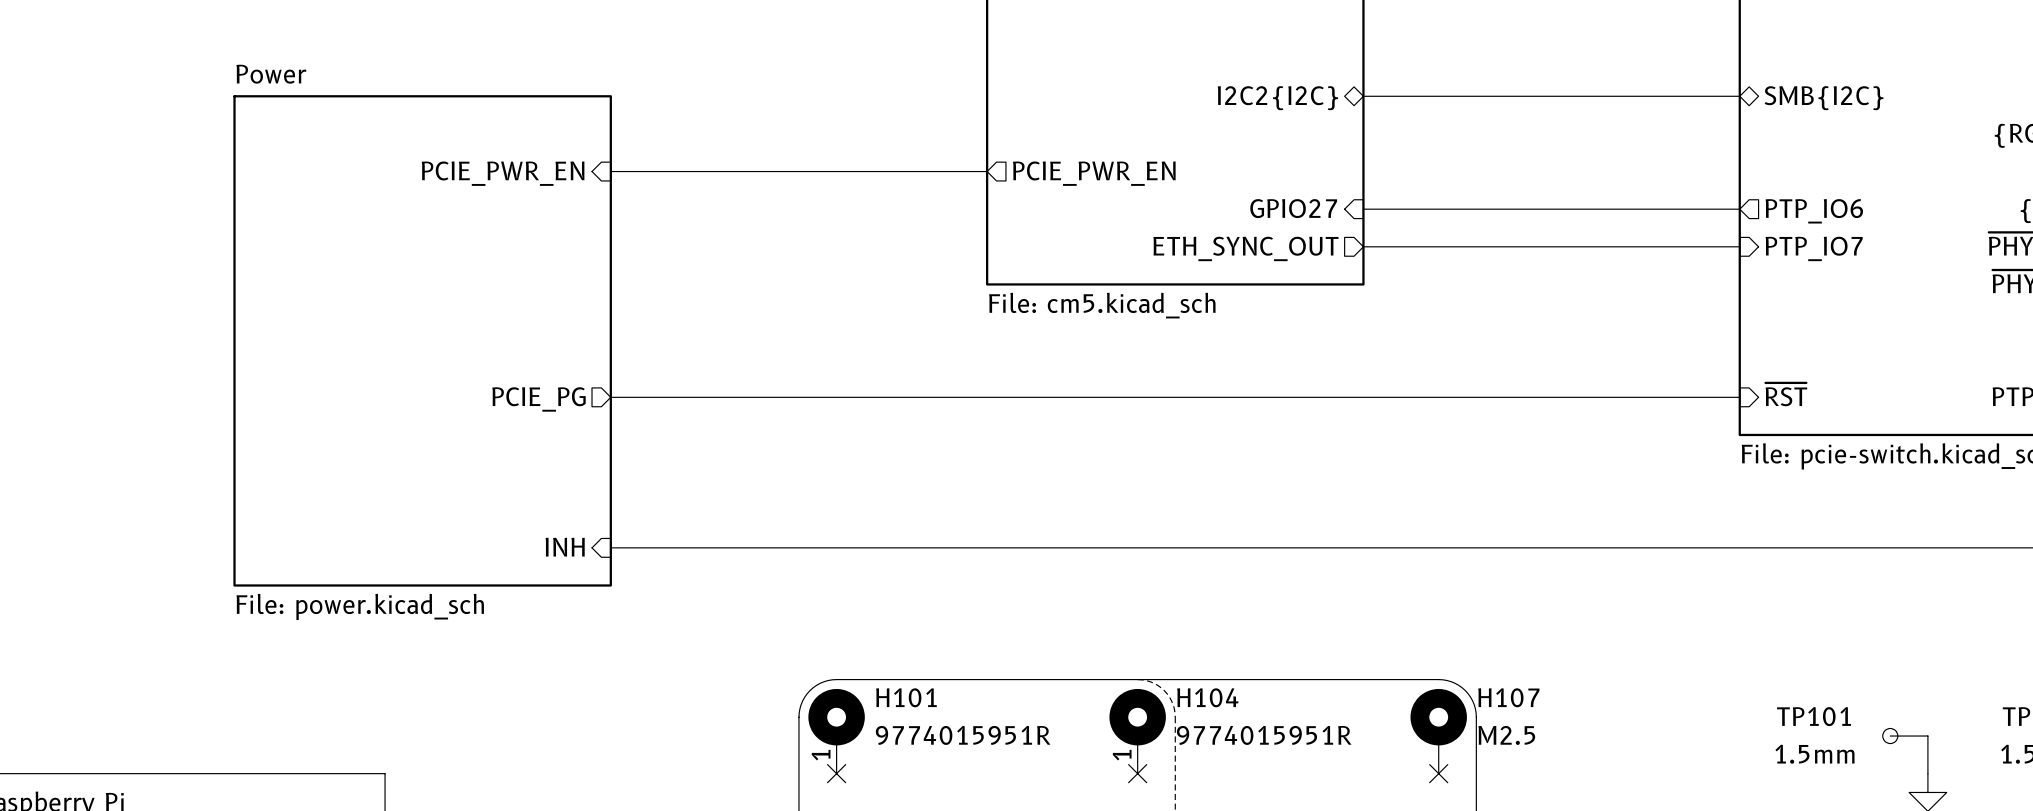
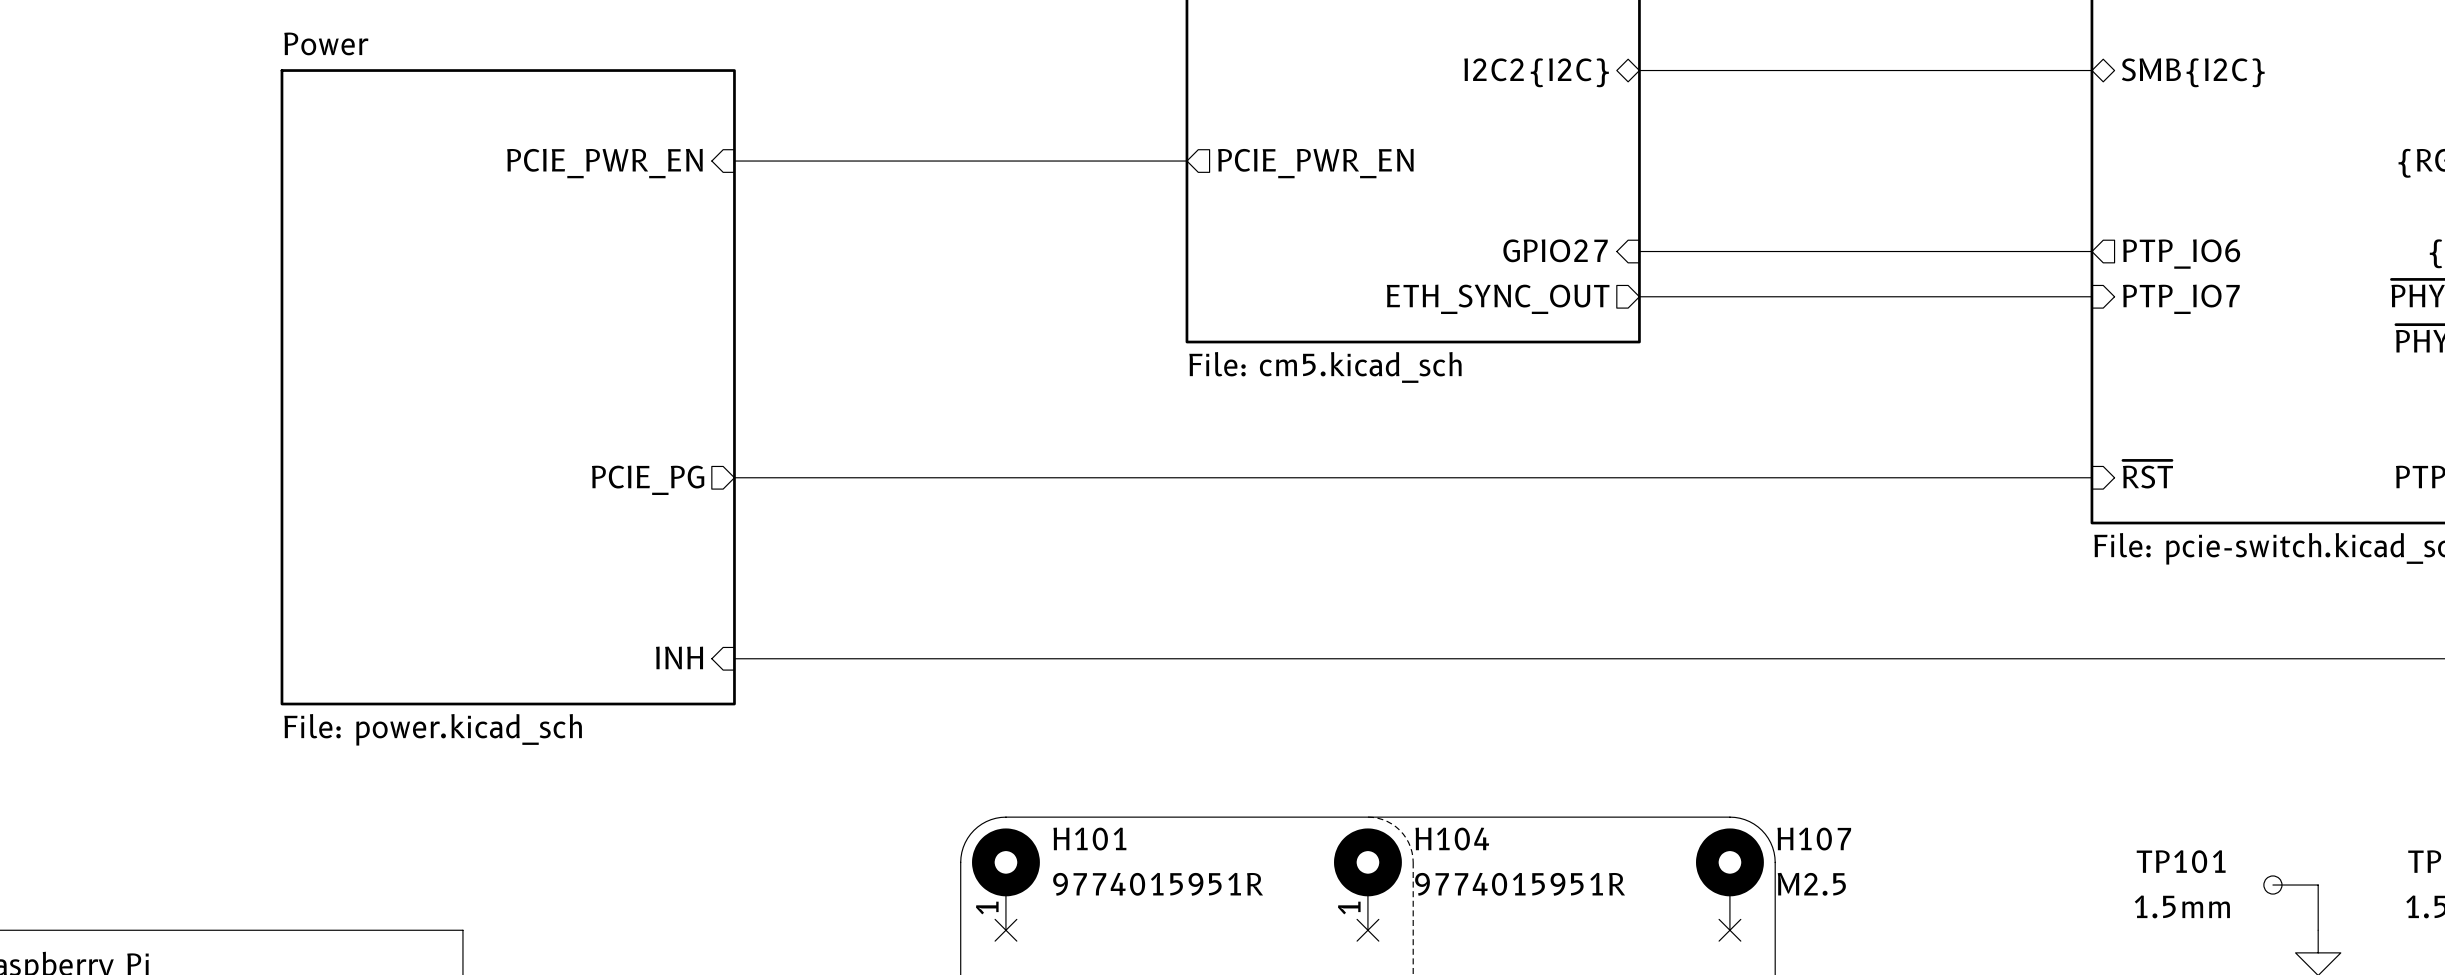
bus: (1363, 96) (1739, 96) -> (1639, 70) (2091, 70)
sheet pin position: I2C2{I2C} (1277, 98) -> I2C2{I2C} (1536, 72)
sheet pin position: SMB{I2C} (1824, 98) -> SMB{I2C} (2193, 72)
wire: (610, 171) (987, 171) -> (734, 161) (1186, 161)
sheet pin position: PCIE_PWR_EN (503, 173) -> PCIE_PWR_EN (604, 163)
sheet pin position: PCIE_PWR_EN (1094, 173) -> PCIE_PWR_EN (1315, 163)
sheet Power: none -> File: power.kicad_sch (508, 387)
sheet Power: File: power.kicad_sch (422, 340) -> none

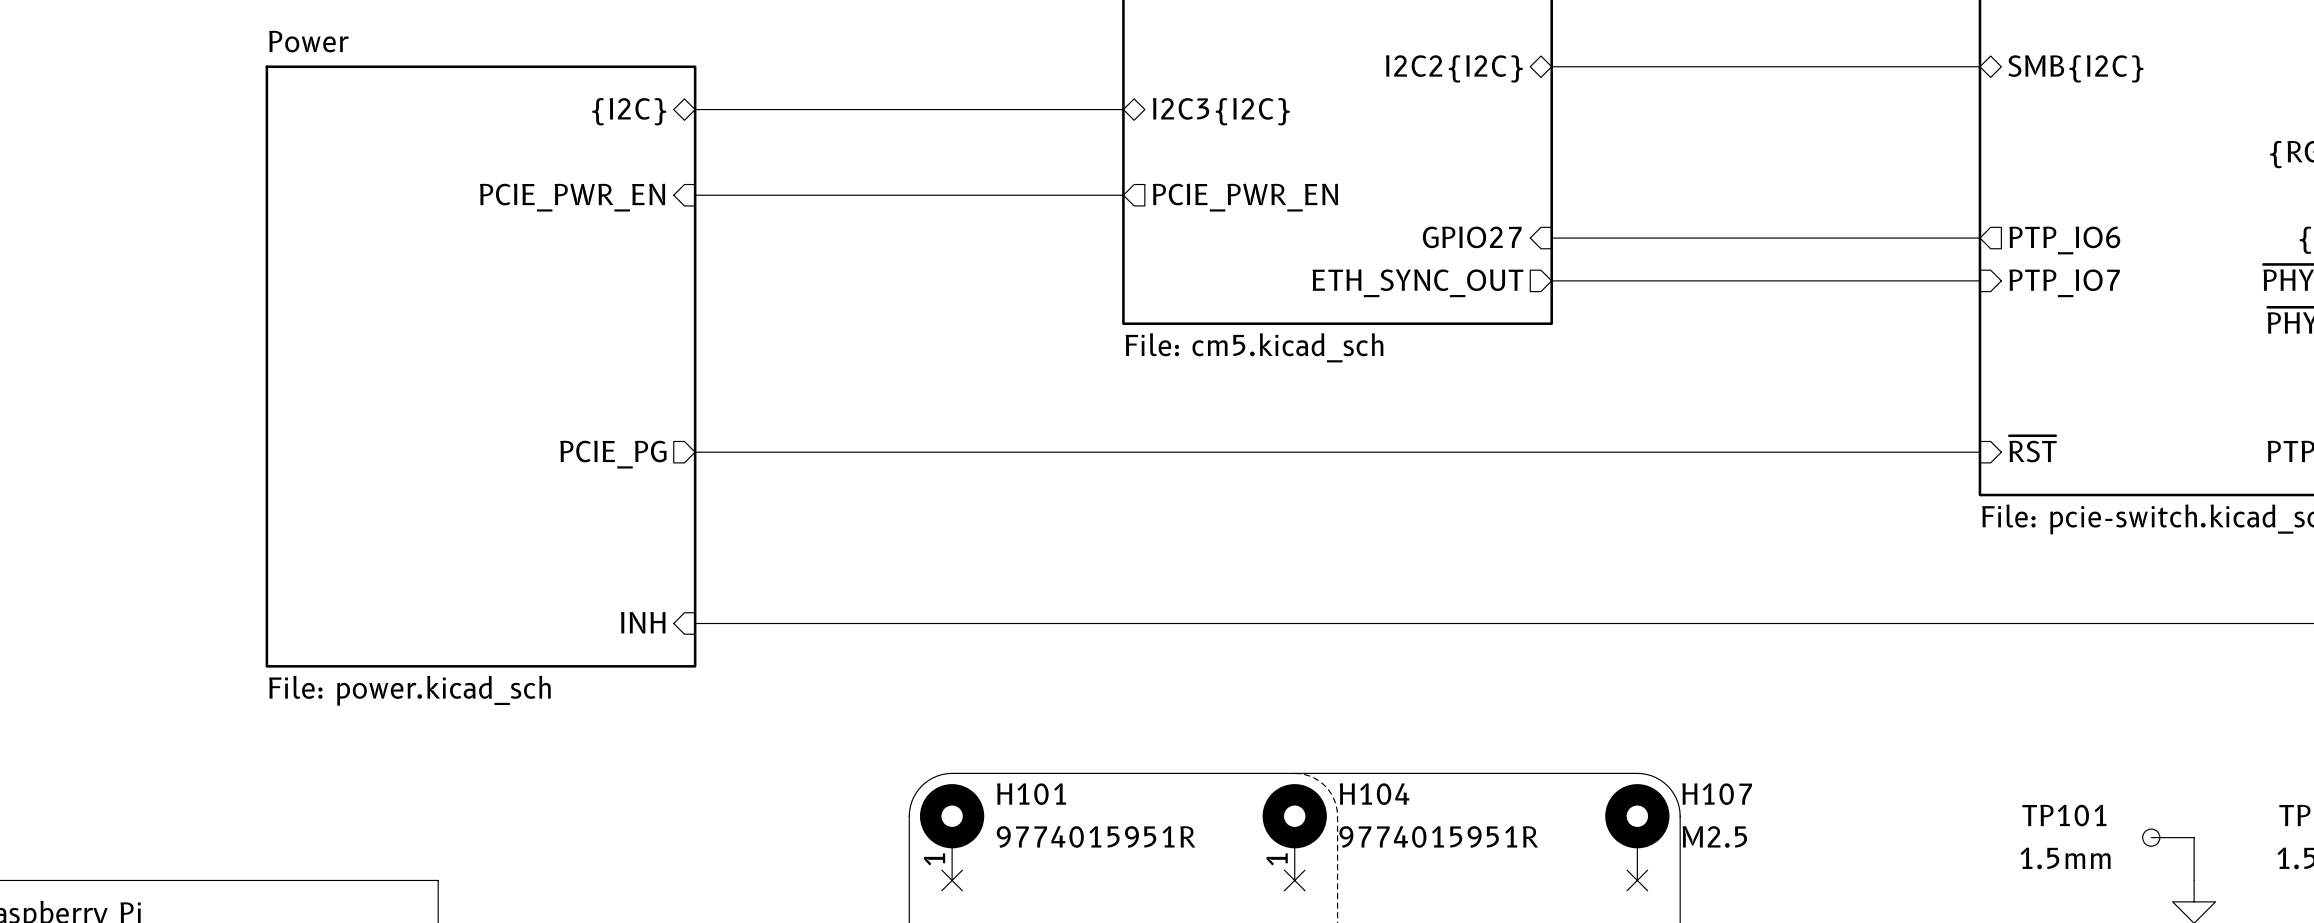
bus: none -> (695, 109) (1123, 109)
sheet pin: none -> {I2C} (629, 111)
sheet pin: none -> I2C3{I2C} (1221, 111)
wire: (734, 161) (1186, 161) -> (695, 195) (1123, 195)
sheet pin position: PCIE_PWR_EN (604, 163) -> PCIE_PWR_EN (572, 197)
sheet pin position: PCIE_PWR_EN (1315, 163) -> PCIE_PWR_EN (1245, 197)

